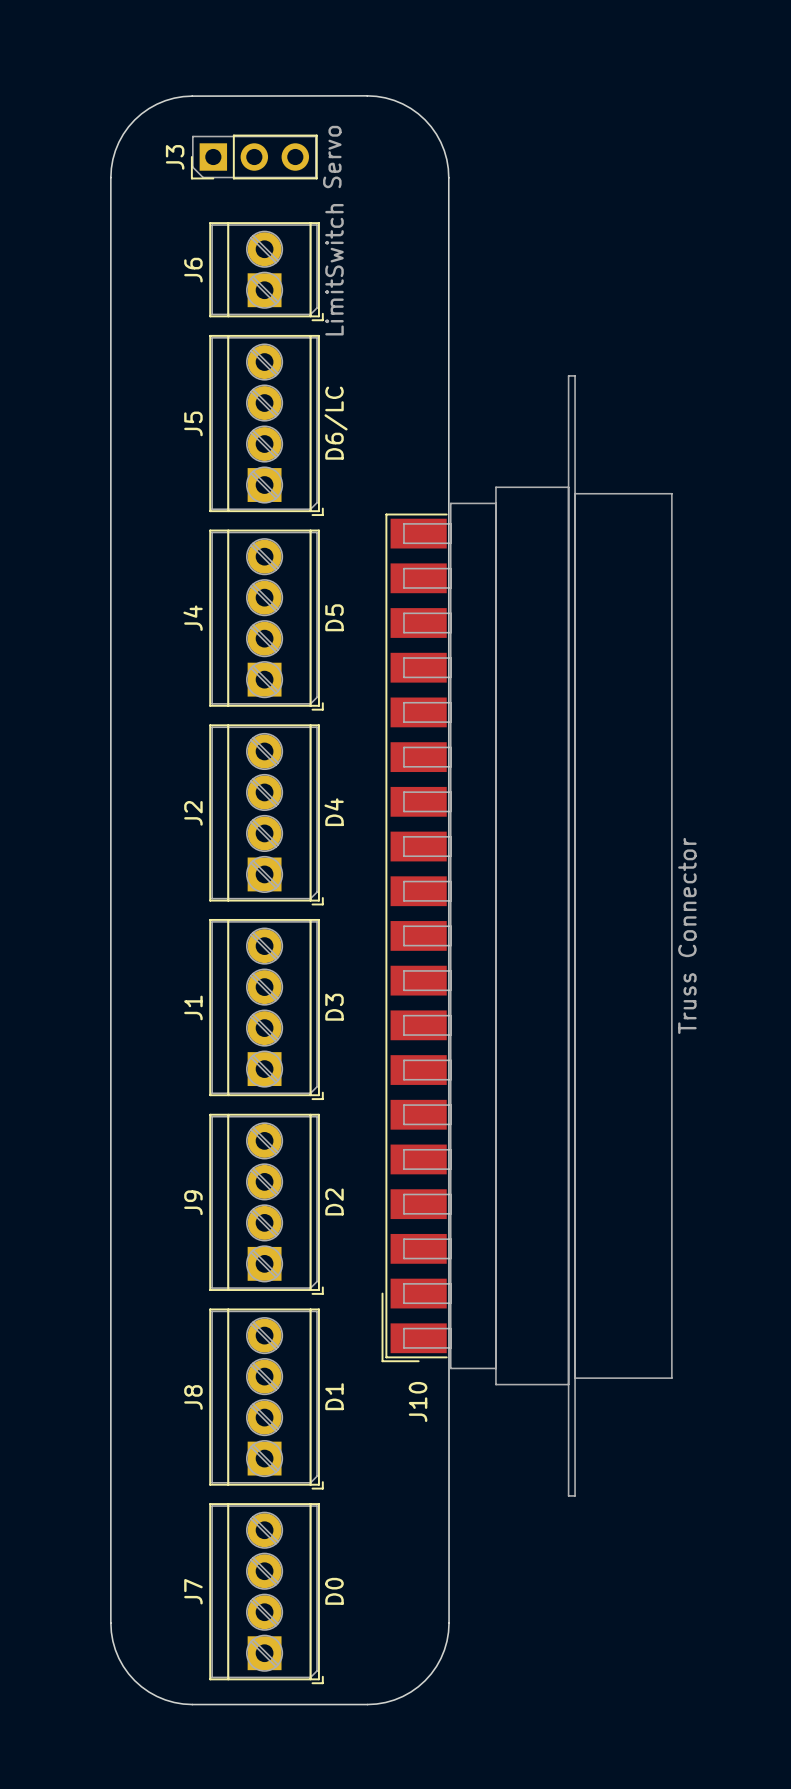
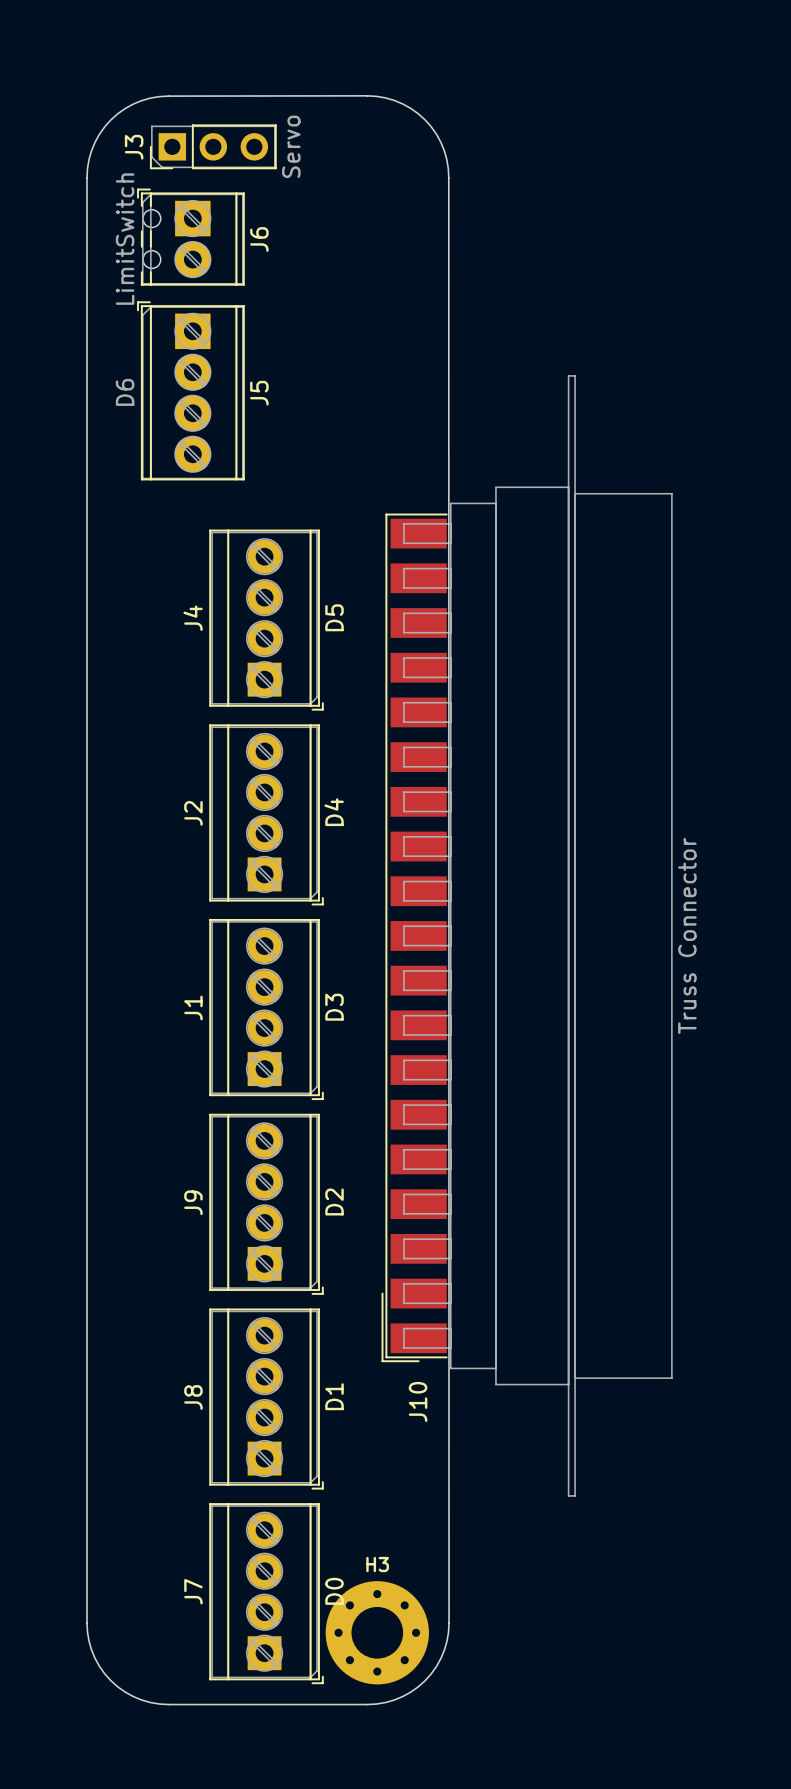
board edge: (367, 95) (192, 96) (174, 98) (148, 108) (128, 126) (118, 142) (111, 168) (110, 1623) (115, 1649) (123, 1666) (134, 1680) (148, 1692) (165, 1699) (192, 1704) -> (367, 95) (168, 96) (150, 98) (125, 108) (104, 126) (91, 150) (87, 168) (87, 1632) (91, 1649) (99, 1666) (110, 1680) (125, 1692) (150, 1702) (192, 1704)
J3 position: (254, 157) -> (213, 146)
J6 footprint: [209, 222, 324, 322] -> [137, 188, 245, 286]
J6 value position: LimitSwitch (334, 269) -> LimitSwitch (125, 239)
J6 name position: J6 (193, 270) -> J6 (259, 239)
J5 footprint: [209, 334, 324, 517] -> [137, 301, 245, 481]
J5 name position: J5 (193, 423) -> J5 (259, 393)
J5 value: D6/LC (336, 423) -> D6 (125, 392)
H3: none -> (377, 1632)

